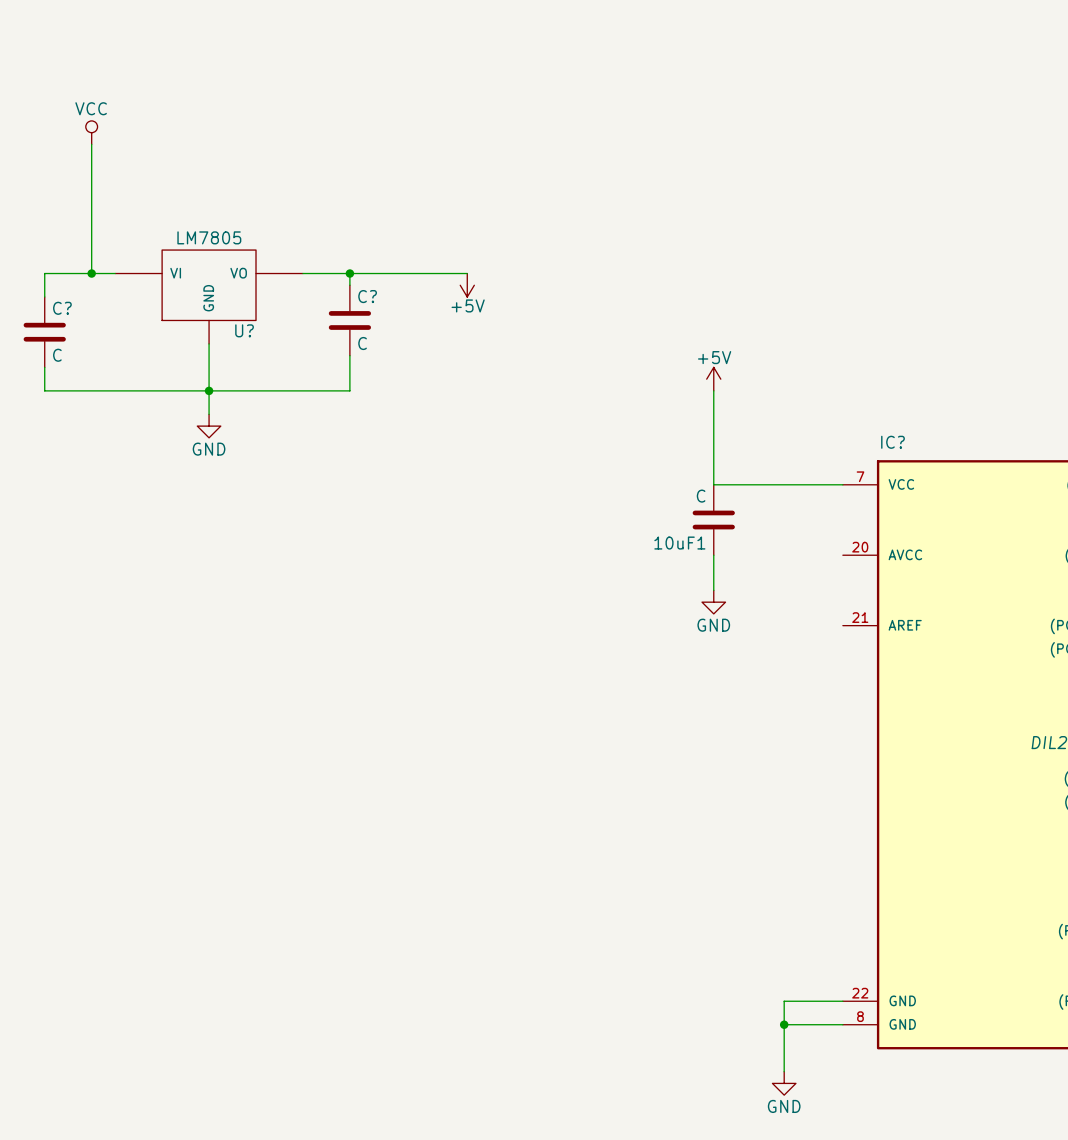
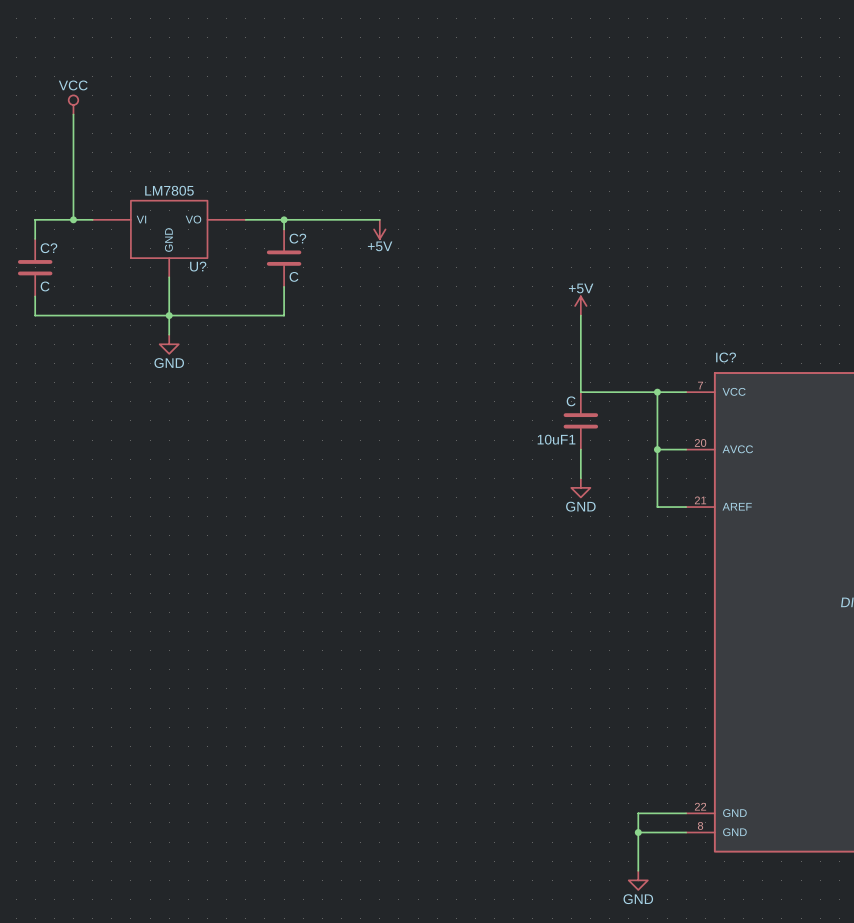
wire: none -> (657, 392) (657, 507) (686, 507)
junction: none -> (657, 392)
wire: none -> (657, 449) (686, 449)
junction: none -> (657, 449)

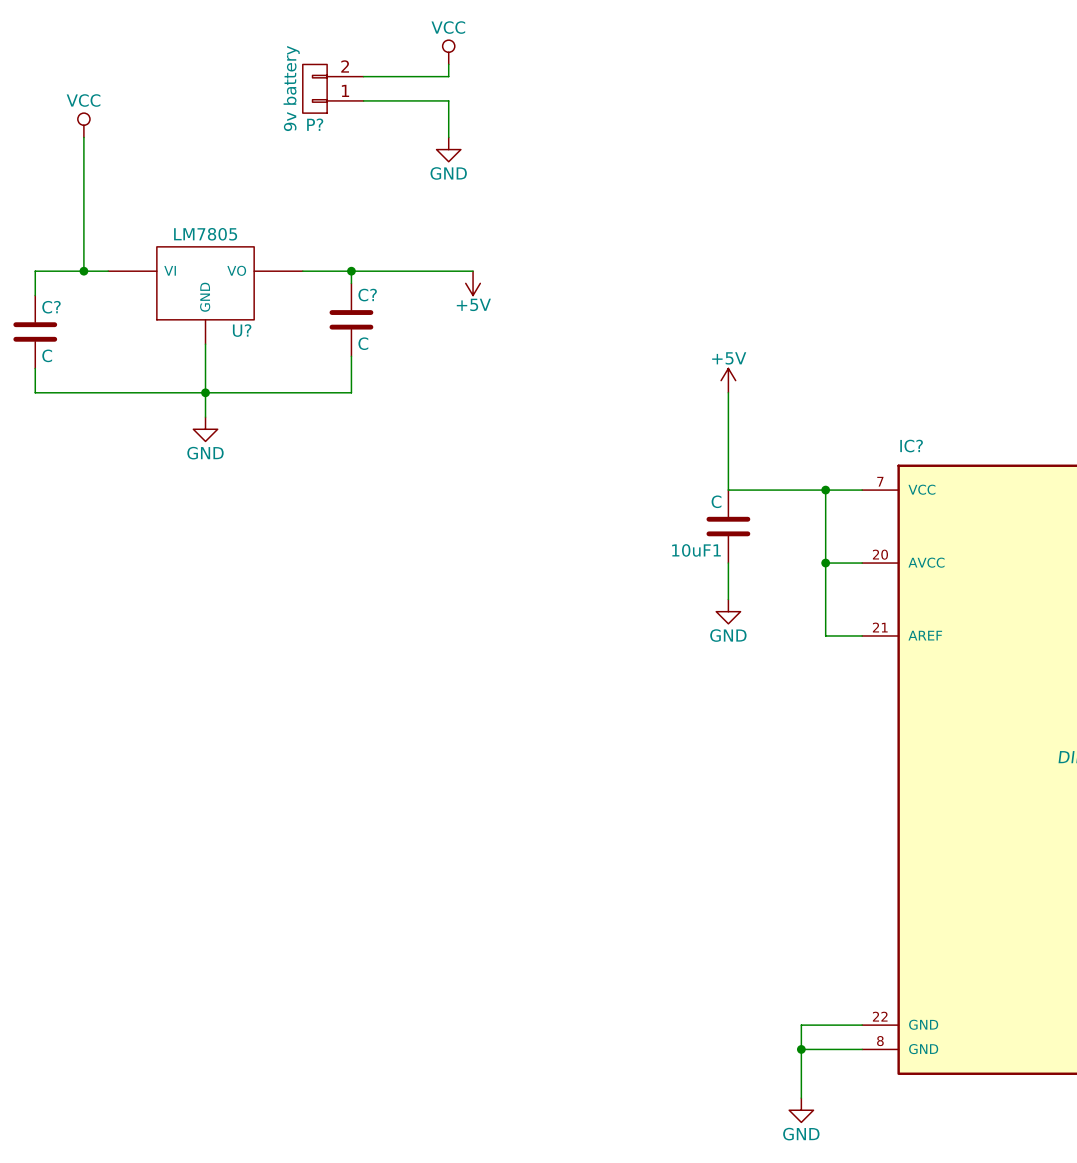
power symbol: none -> VCC (448, 52)
wire: none -> (448, 64) (448, 76) (363, 76)
P?: none -> 9v battery (333, 88)
wire: none -> (363, 100) (448, 100) (448, 137)
power symbol: none -> GND (448, 149)

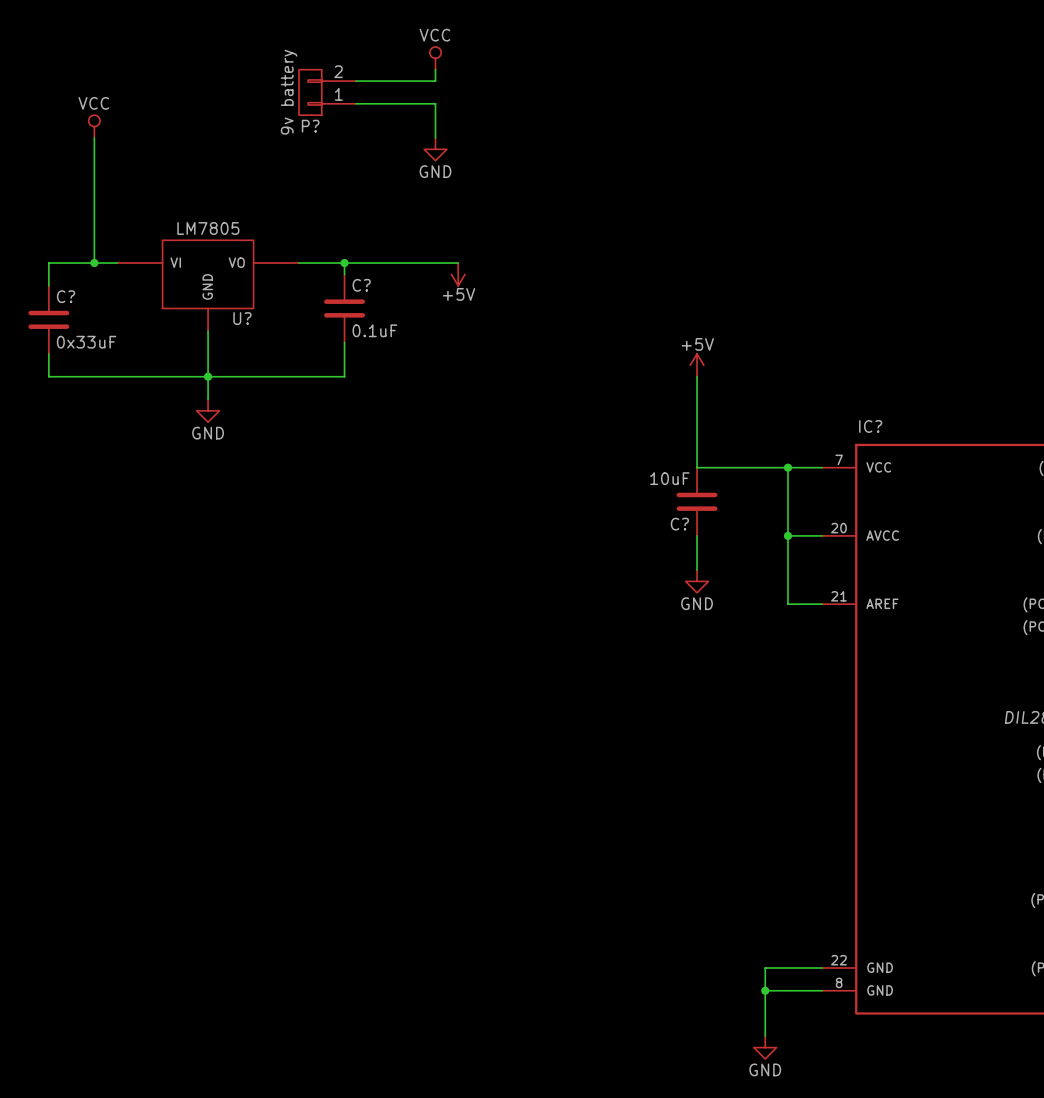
C? value: C (363, 343) -> 0.1uF (374, 330)
C? value: C (47, 355) -> 0x33uF (86, 342)
10uF1 value: C (716, 501) -> 10uF (669, 478)
10uF1 name: 10uF1 (696, 550) -> C? (679, 524)

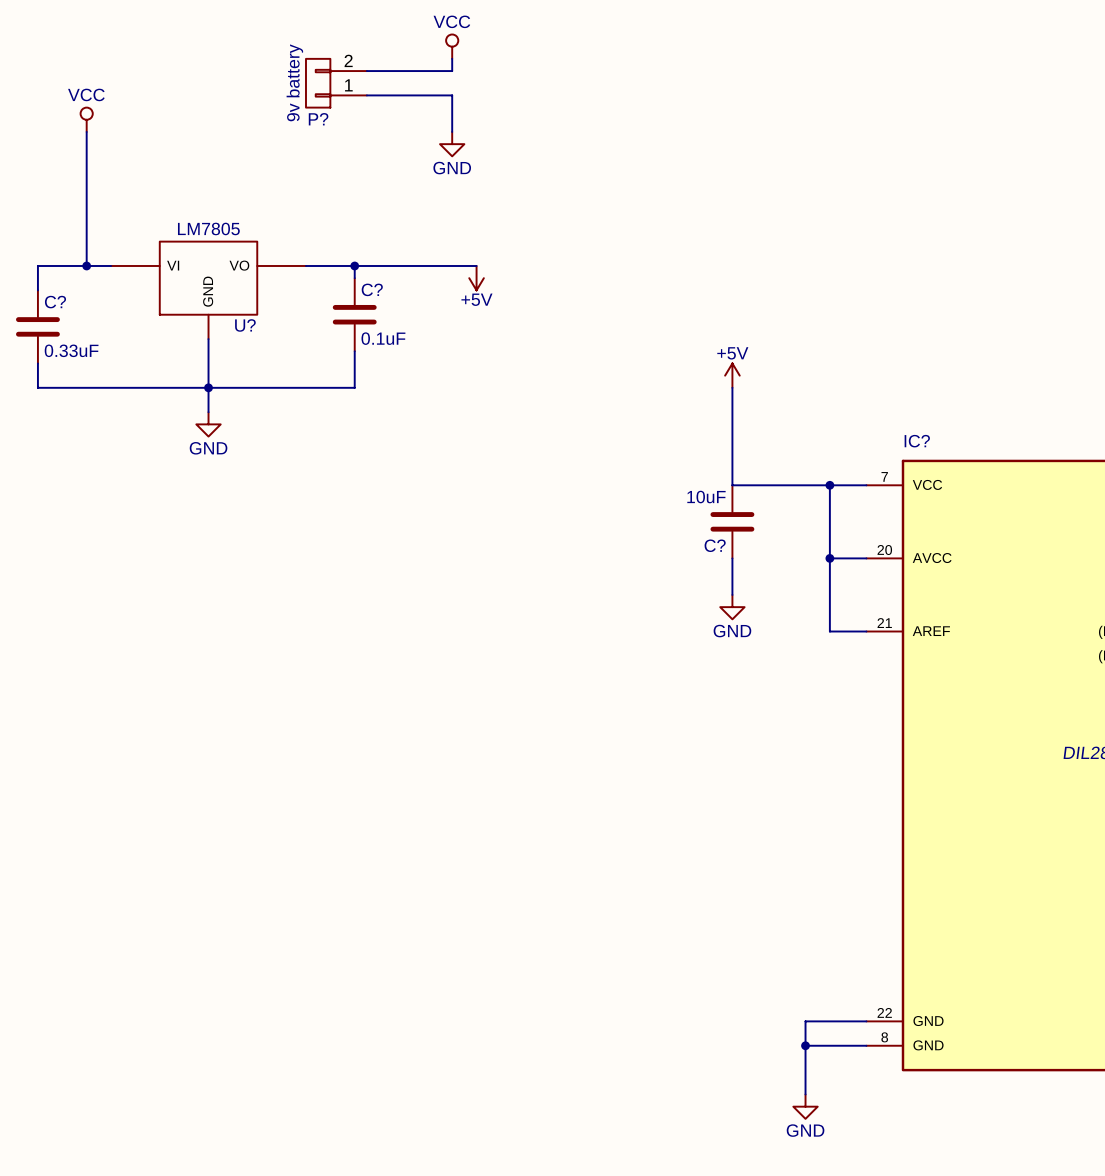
C? value: 0x33uF (86, 342) -> 0.33uF (71, 350)

